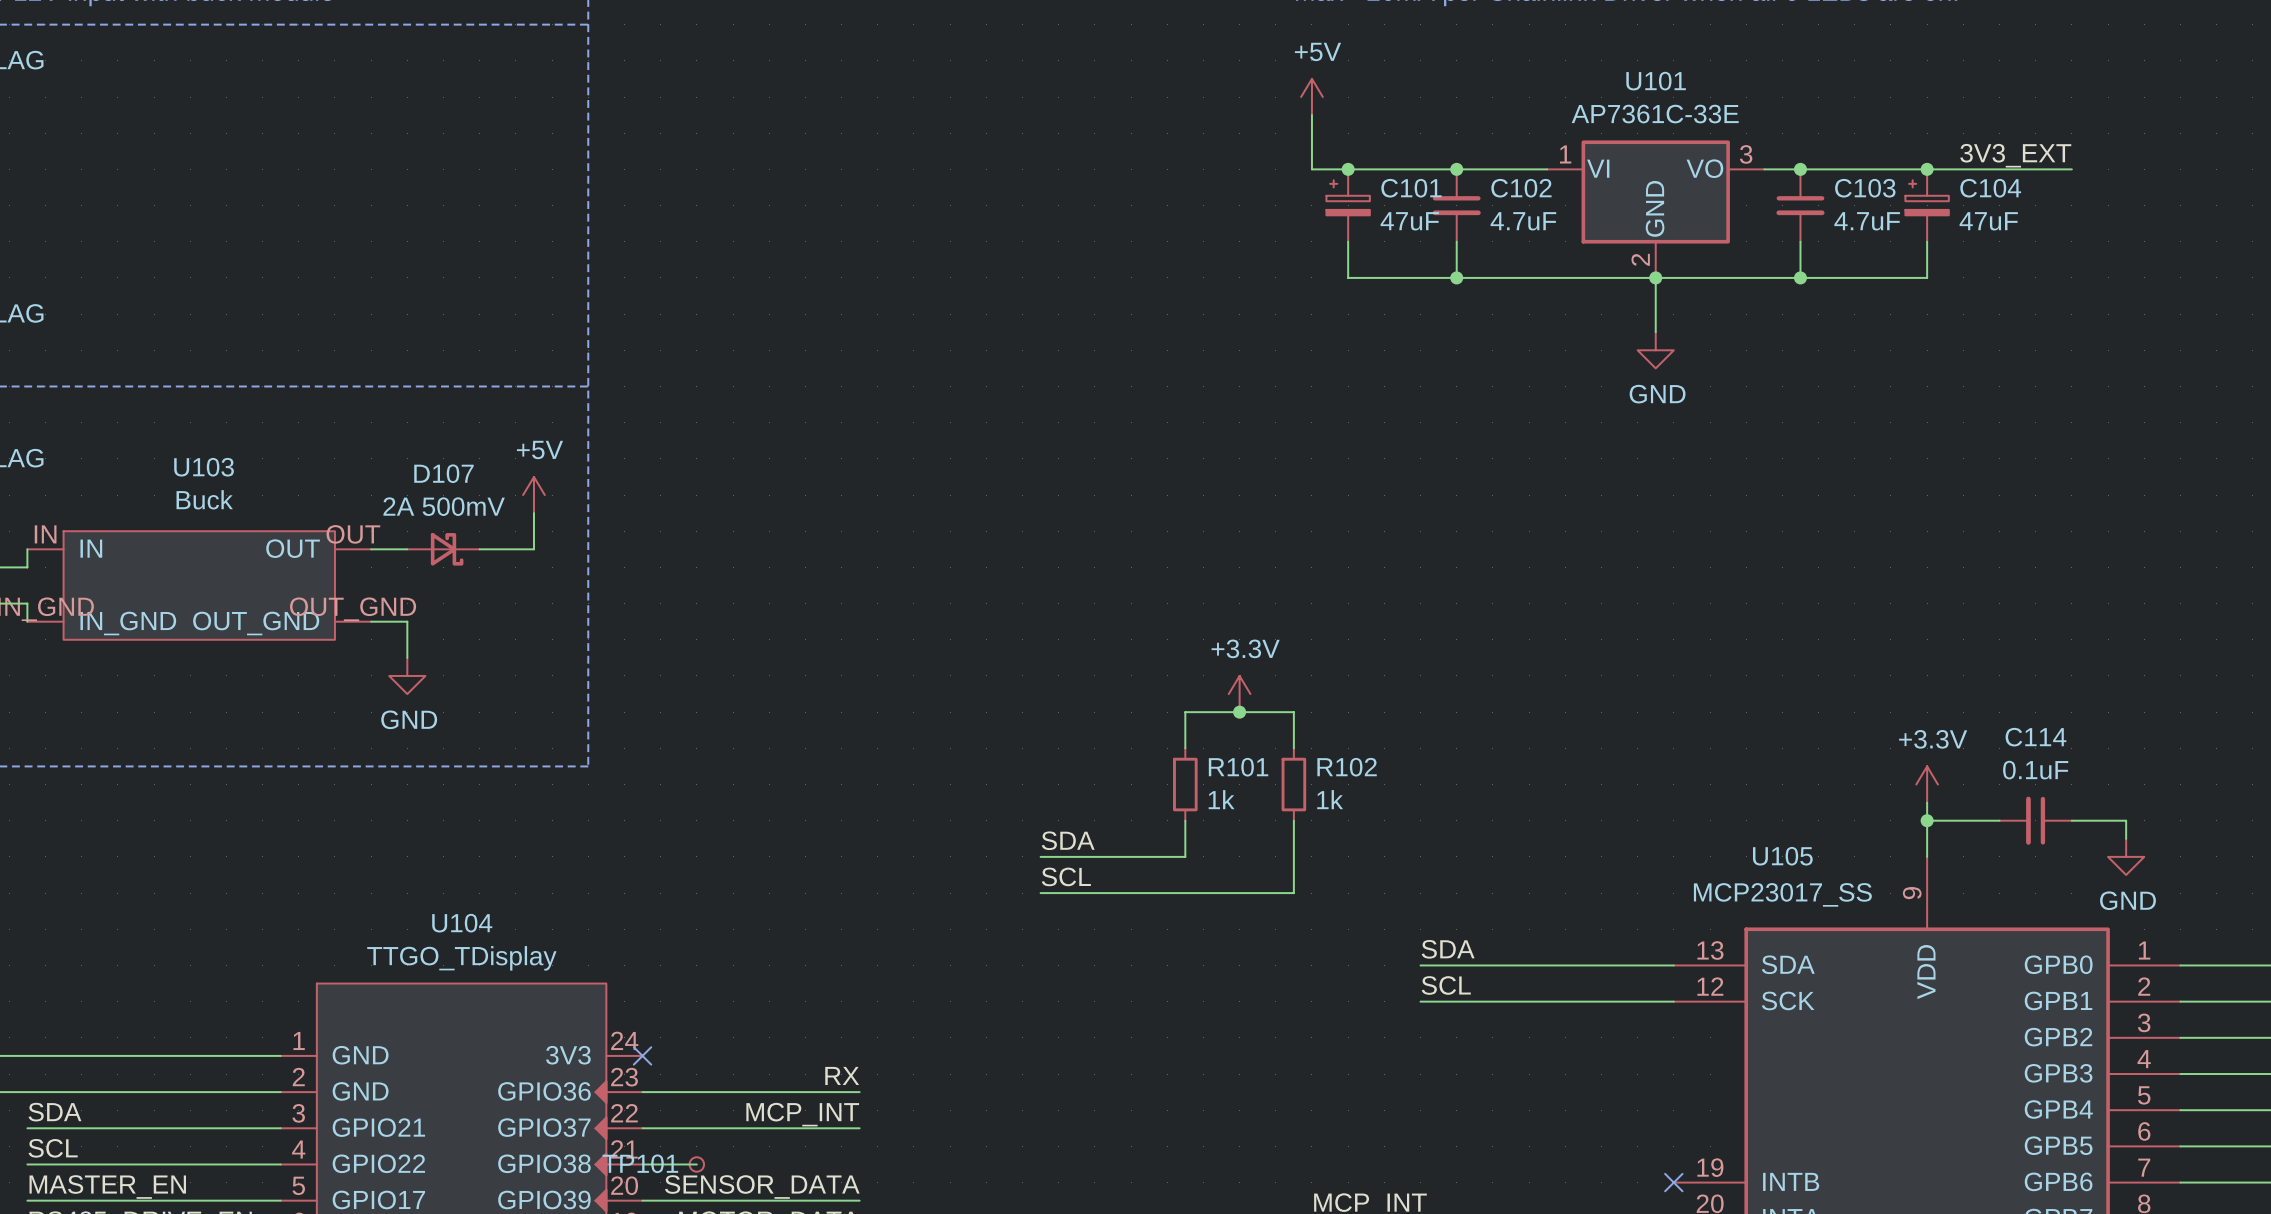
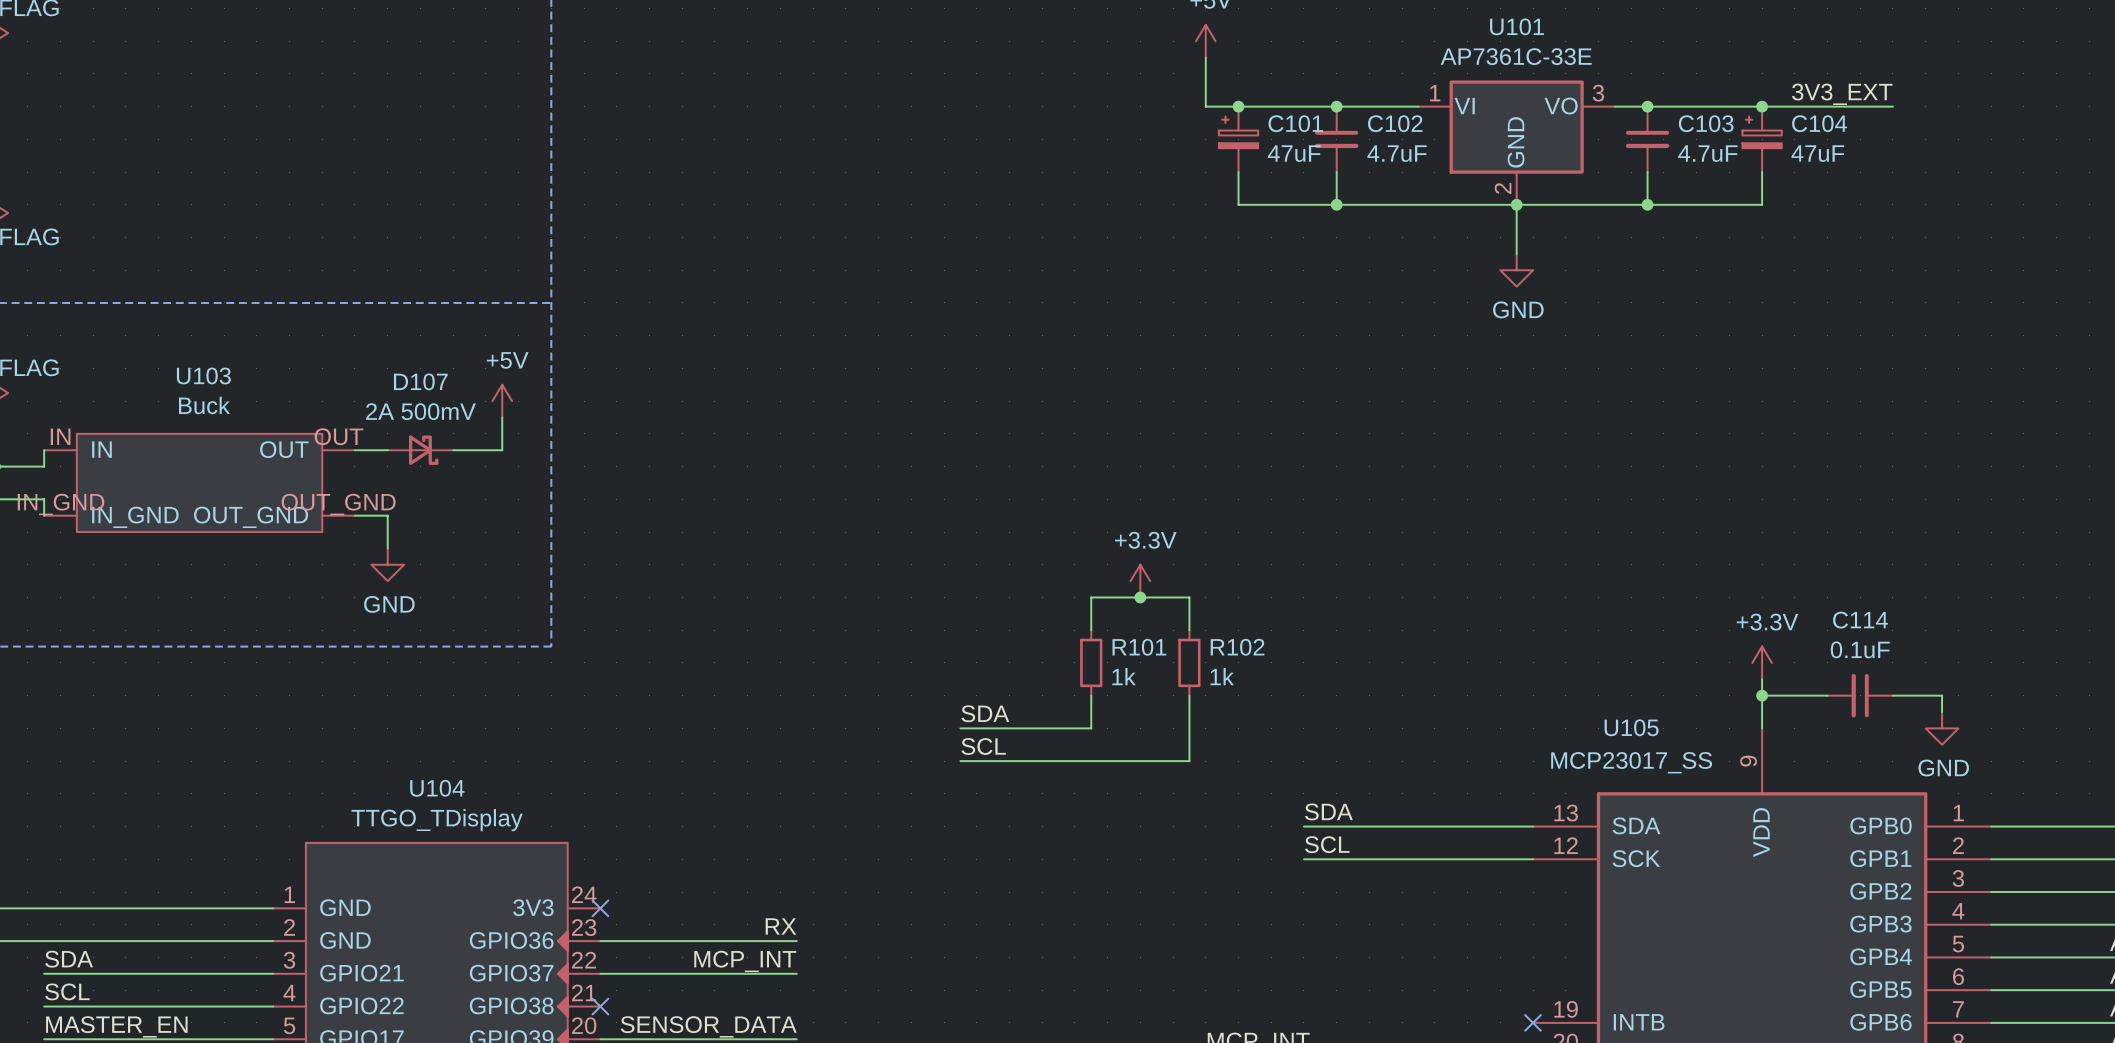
wire: (642, 1164) (696, 1164) -> none
no-connect mark: none -> (600, 1006)
TP101: (696, 1164) -> none

